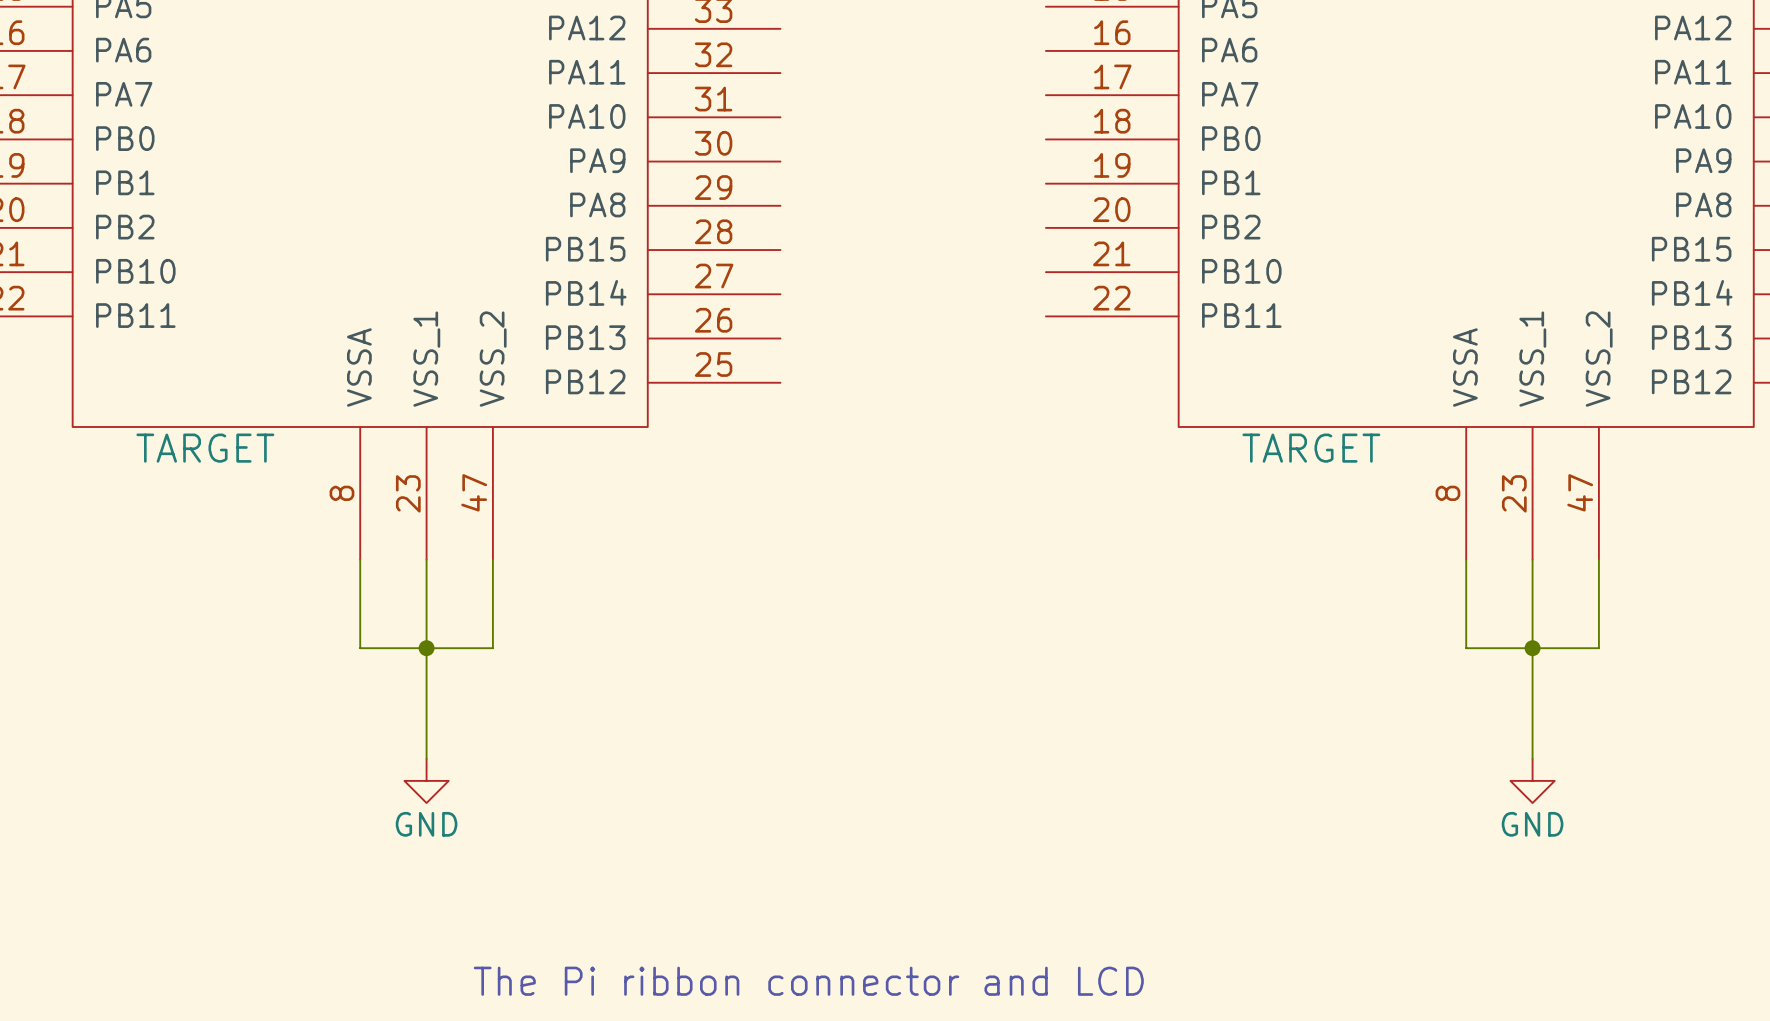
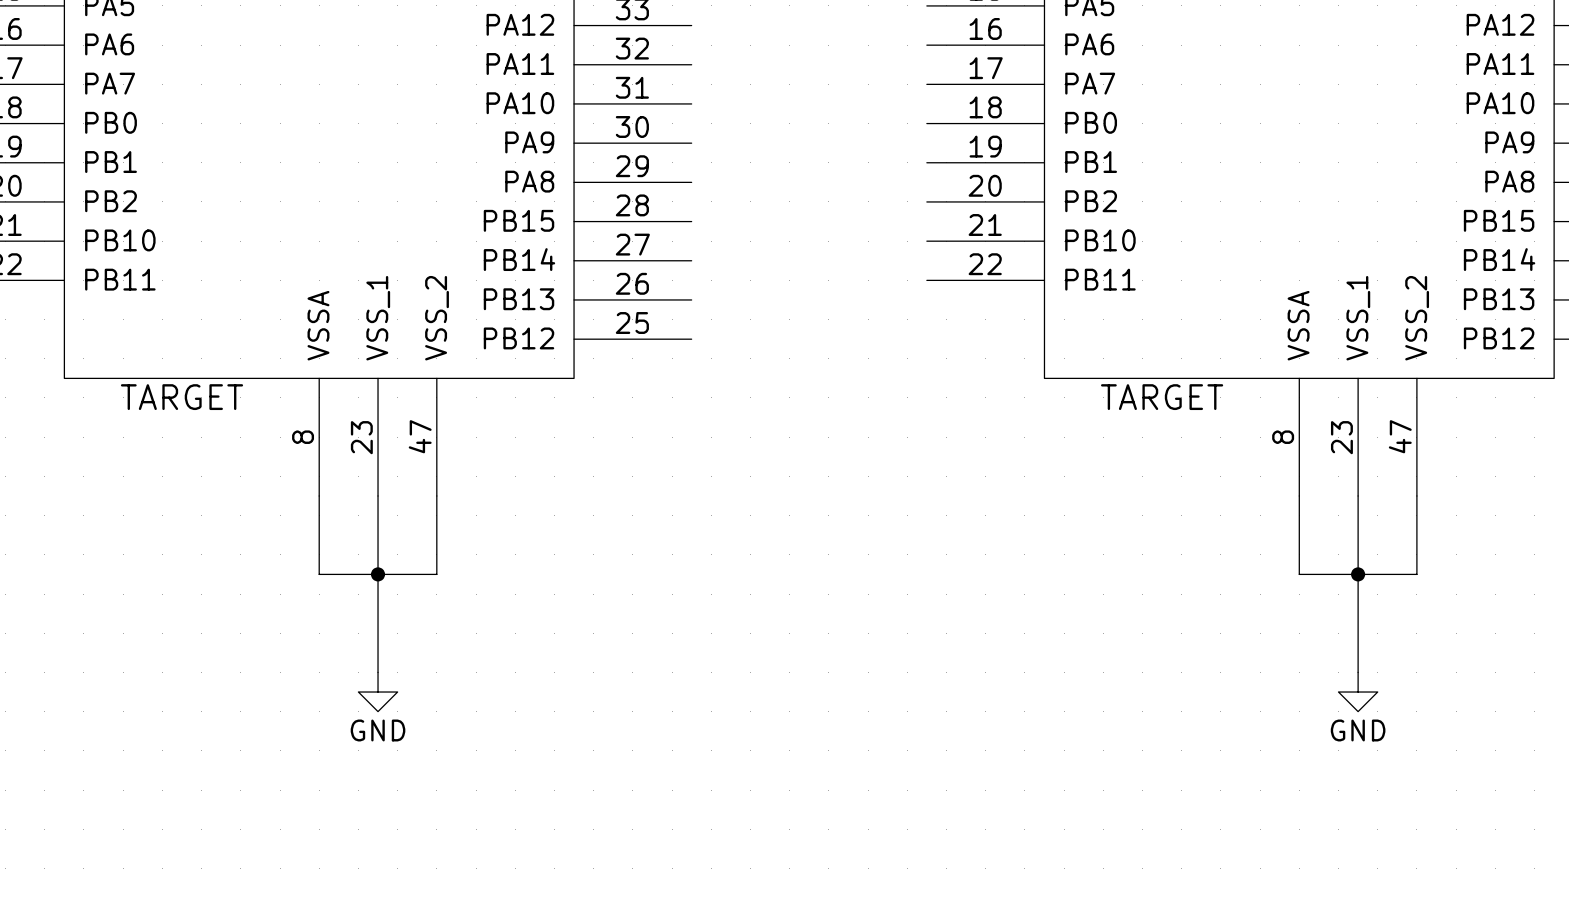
text: The Pi ribbon connector and LCD (808, 981) -> none

